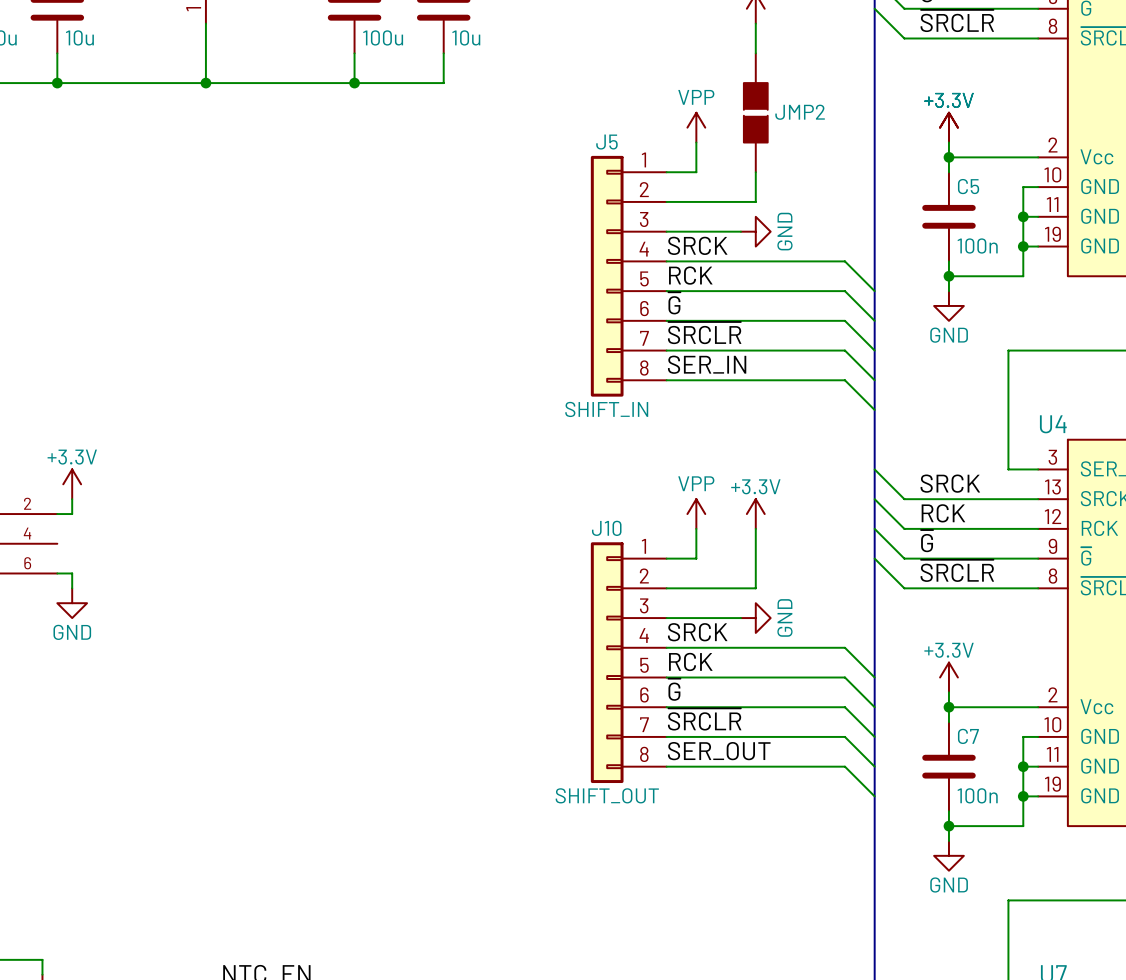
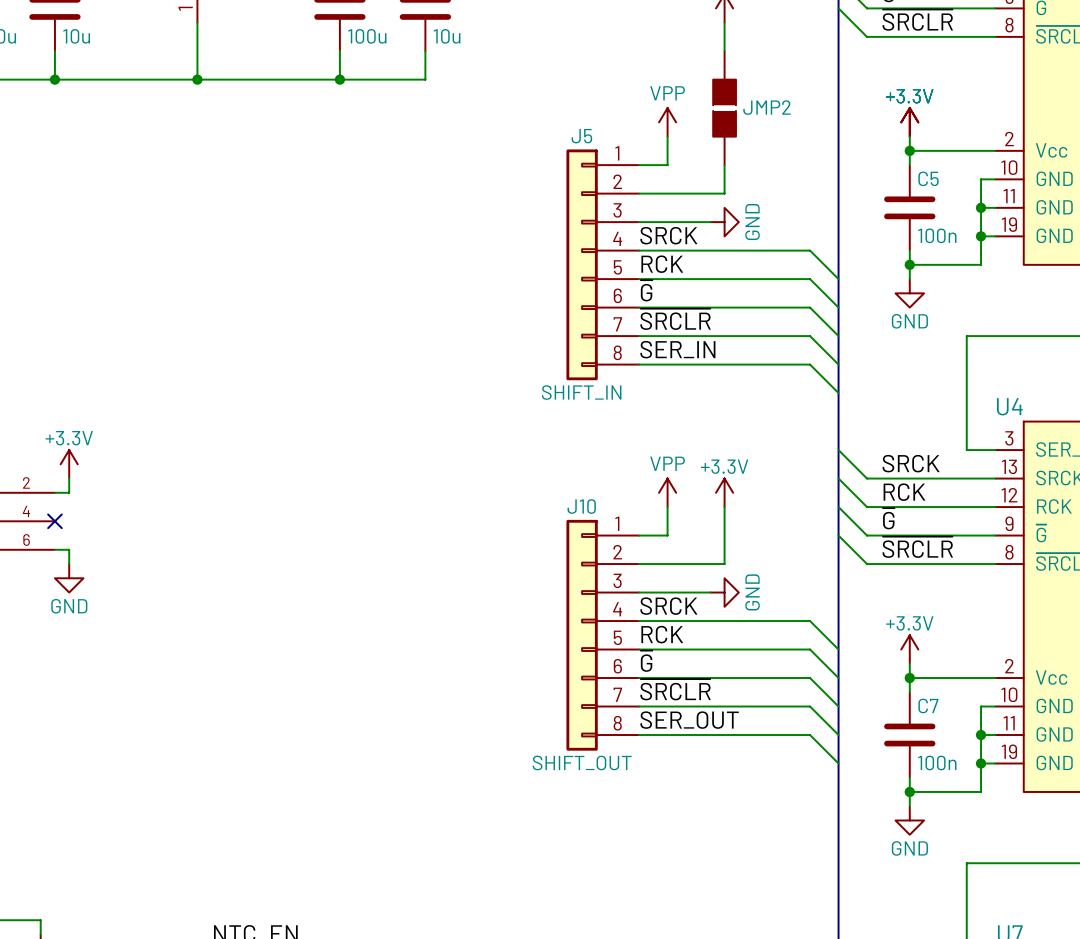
no-connect mark: none -> (54, 521)

